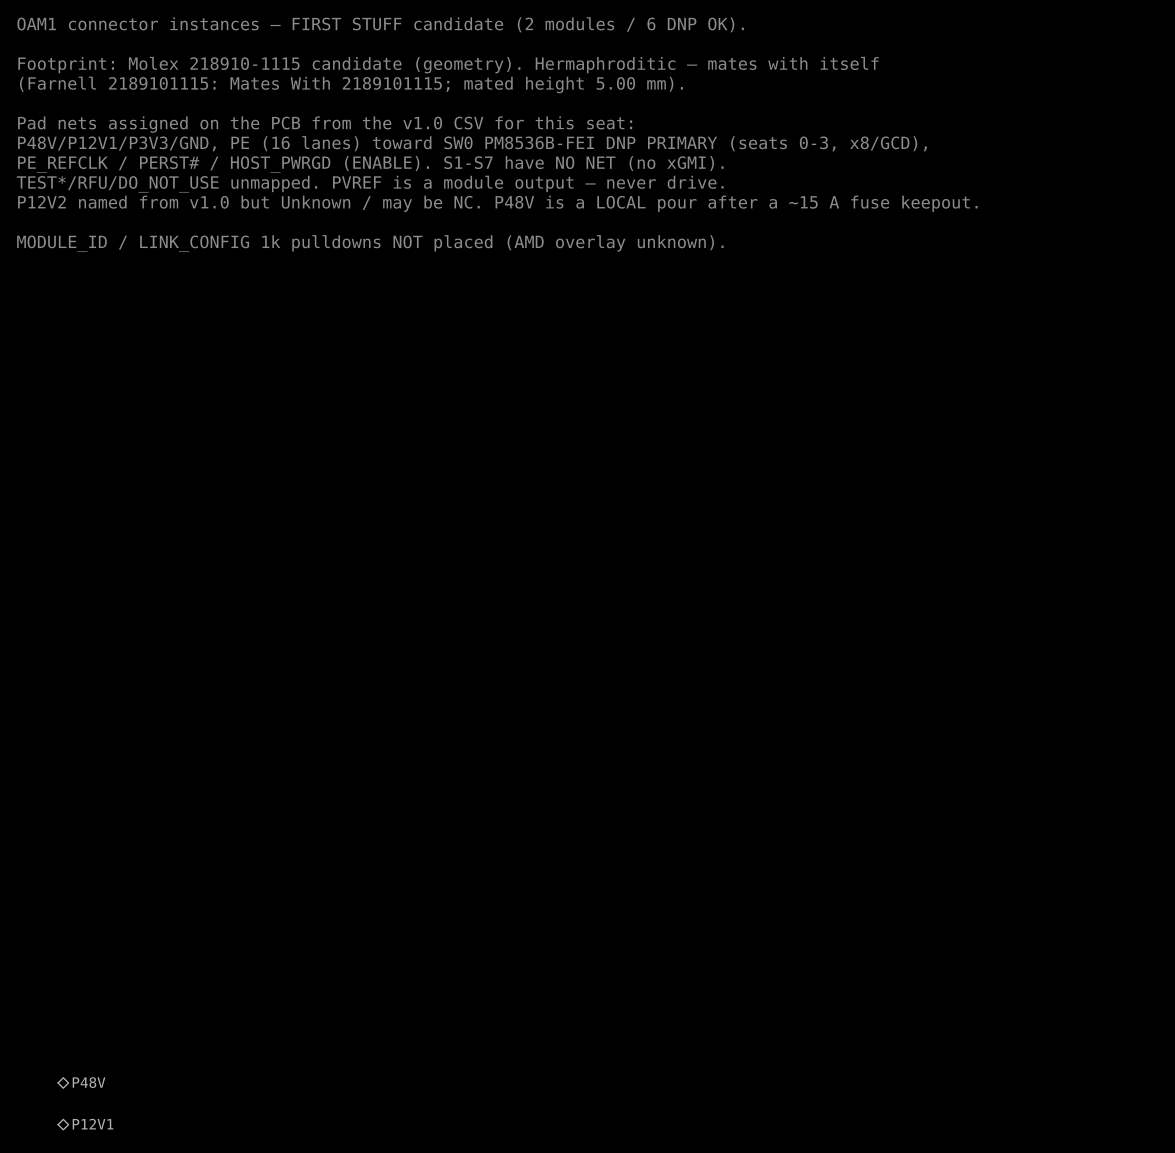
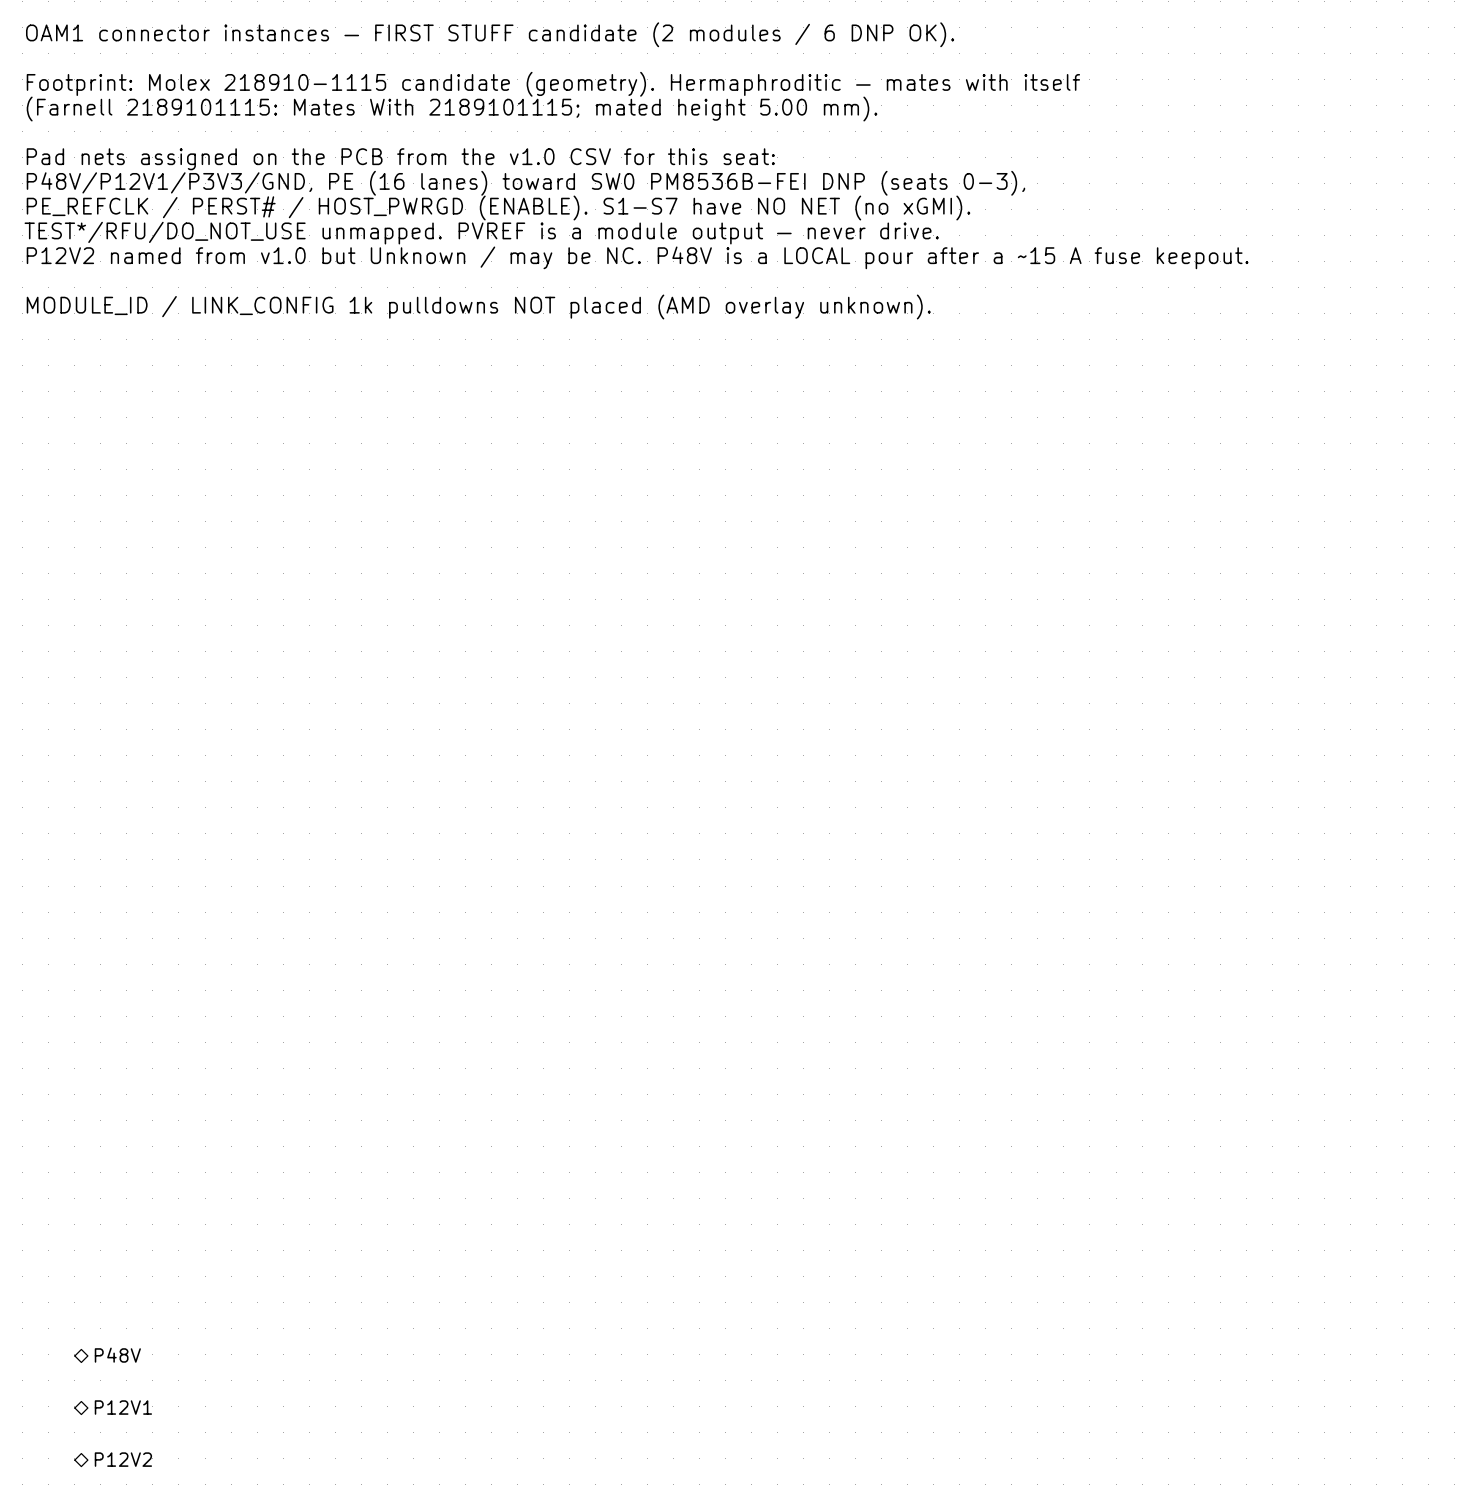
text: P48V/P12V1/P3V3/GND, PE (16 lanes) toward SW0 PM8536B-FEI DNP PRIMARY (seats 0-3, x8/GCD), (472, 143) -> P48V/P12V1/P3V3/GND, PE (16 lanes) toward SW0 PM8536B-FEI DNP (seats 0-3), (525, 183)

